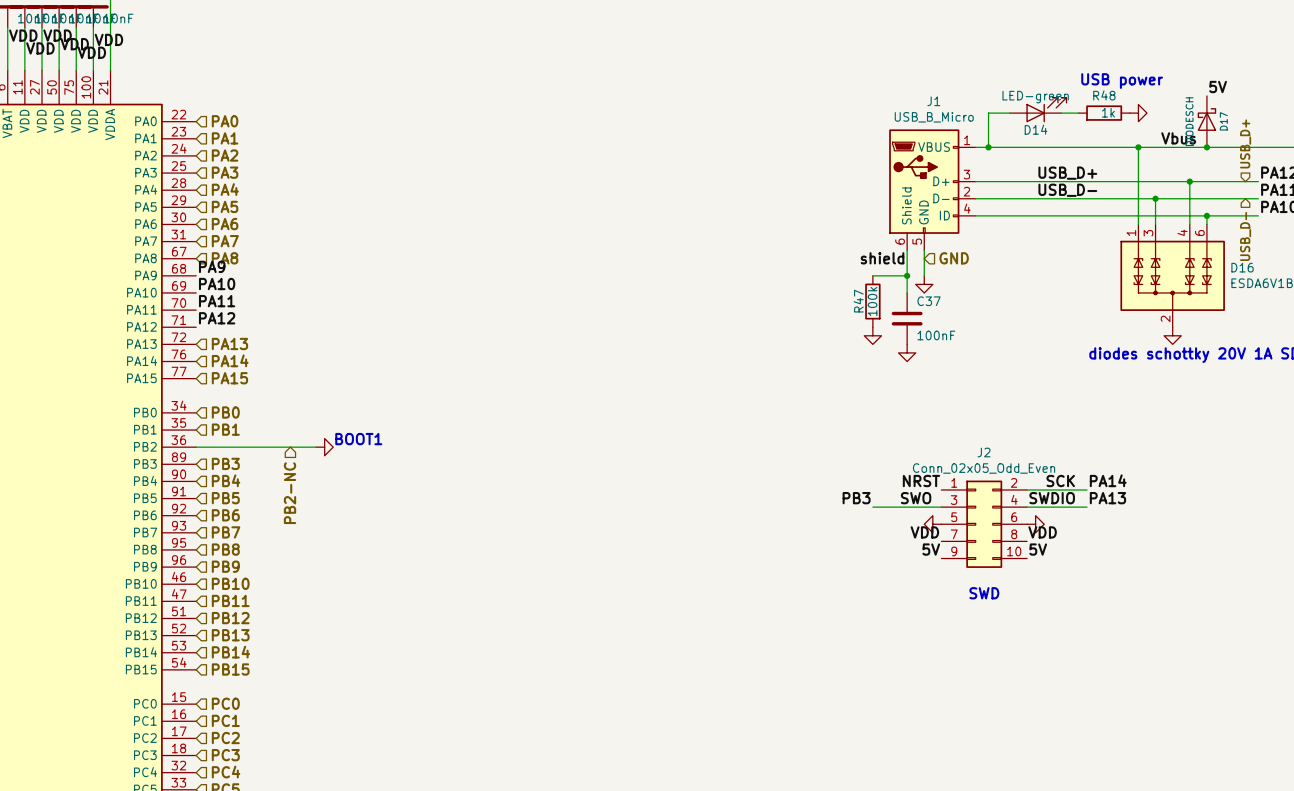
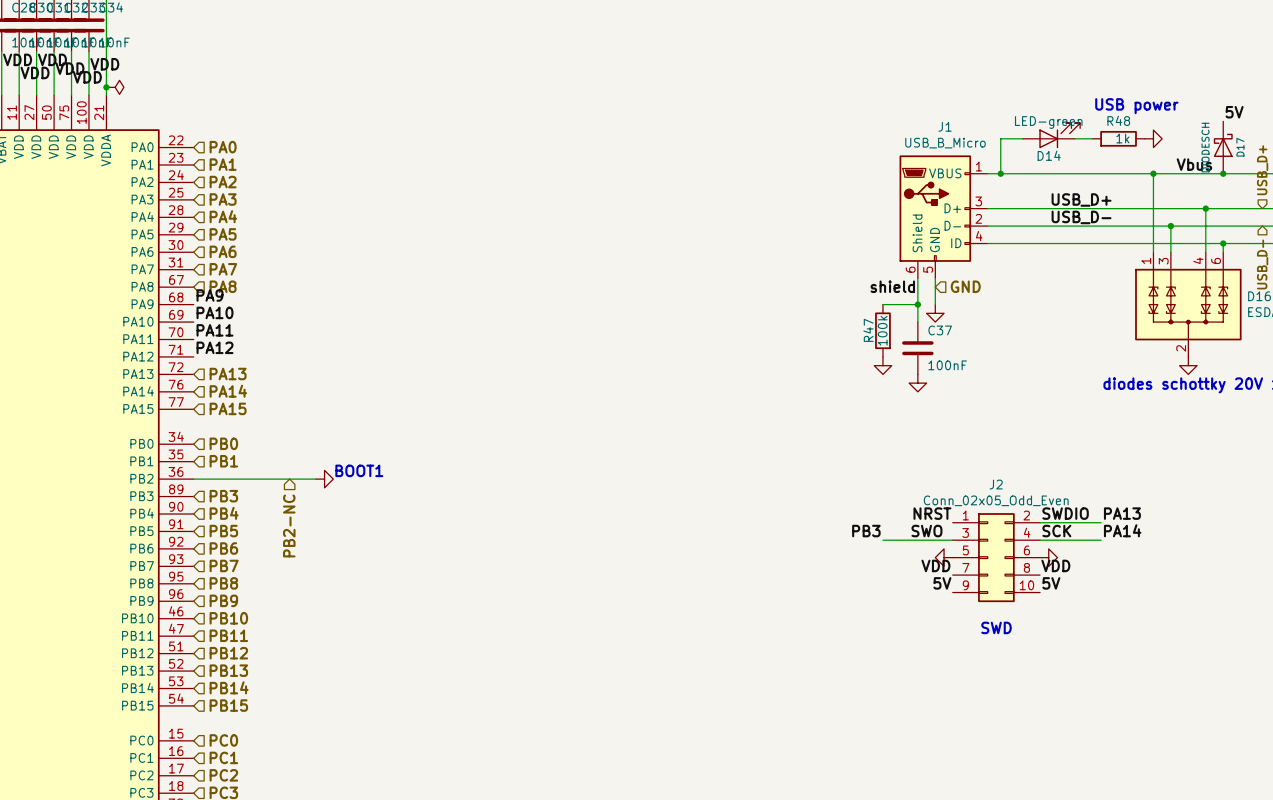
junction: none -> (106, 87)
power symbol: none -> (115, 87)
label: PA14 (1108, 480) -> PA13 (1122, 513)
label: none -> SWDIO (1065, 513)
label: SCK (1060, 481) -> none
label: SWDIO (1052, 498) -> SCK (1056, 531)
label: PA13 (1107, 498) -> PA14 (1122, 530)

